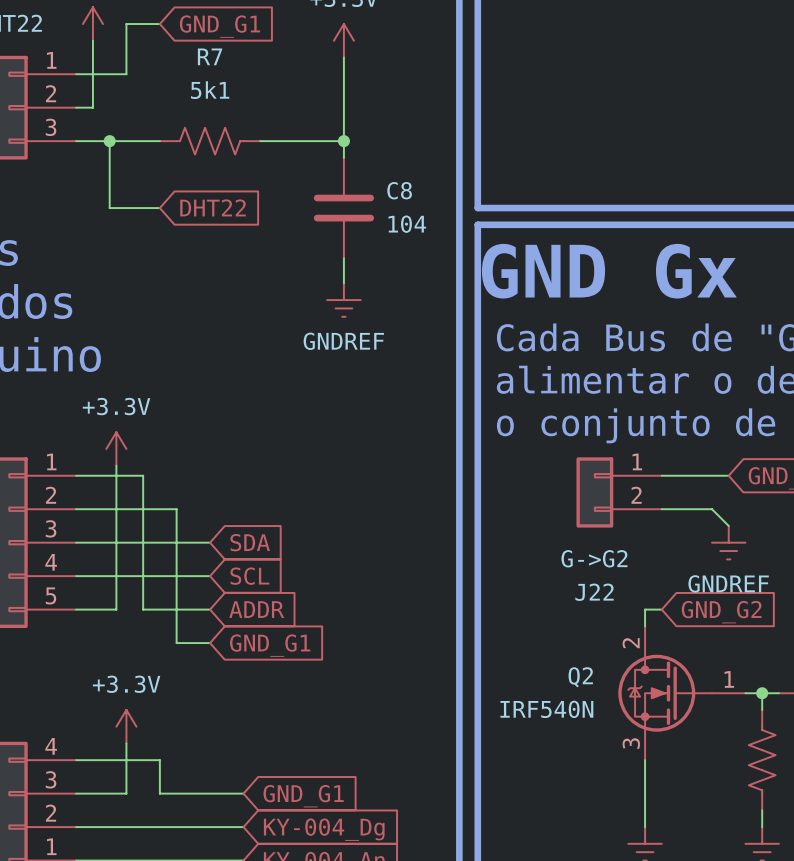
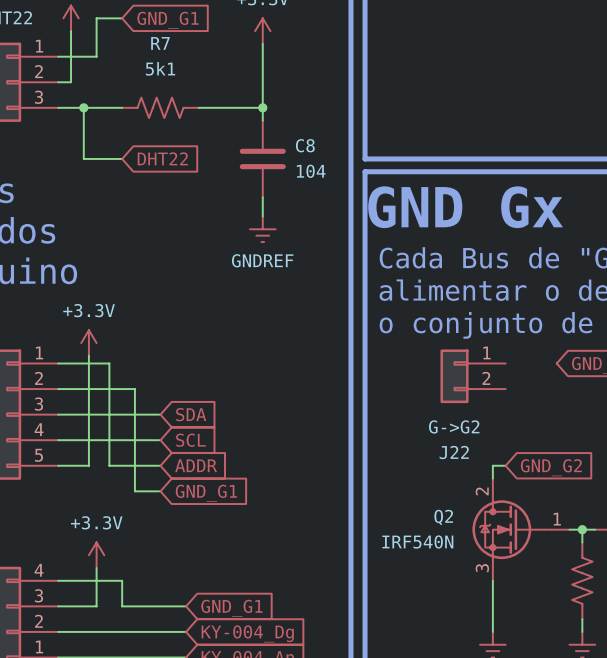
wire: (661, 475) (728, 475) -> none
wire: (661, 509) (711, 509) (728, 525) -> none
power symbol: GNDREF (728, 542) -> none

